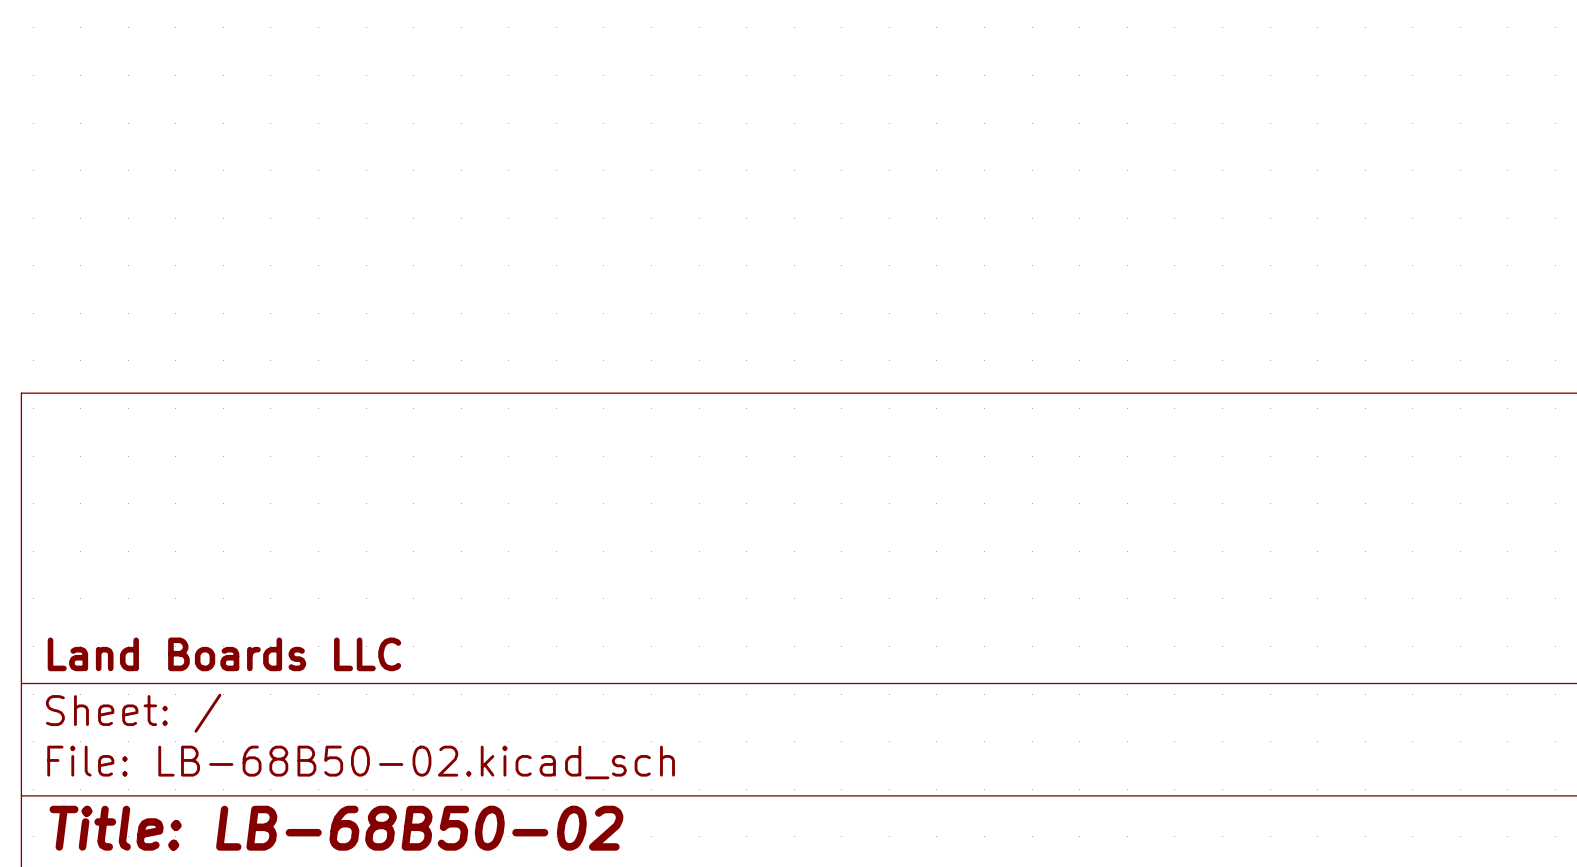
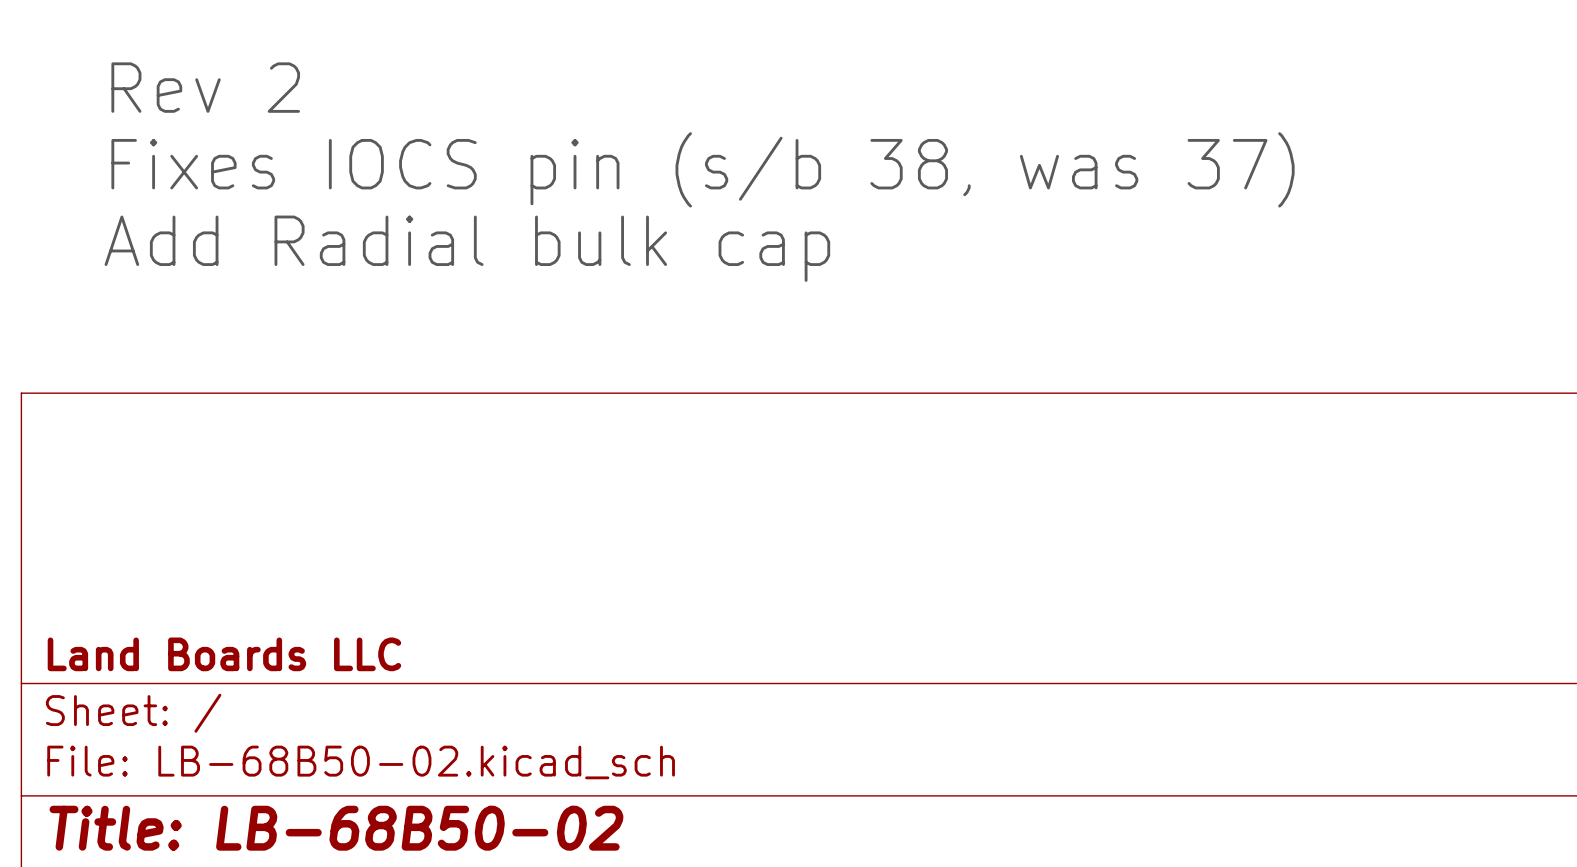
text: none -> Rev 2 (205, 87)
text: none -> Fixes IOCS pin (s/b 38, was 37) (703, 169)
text: none -> Add Radial bulk cap (467, 248)

